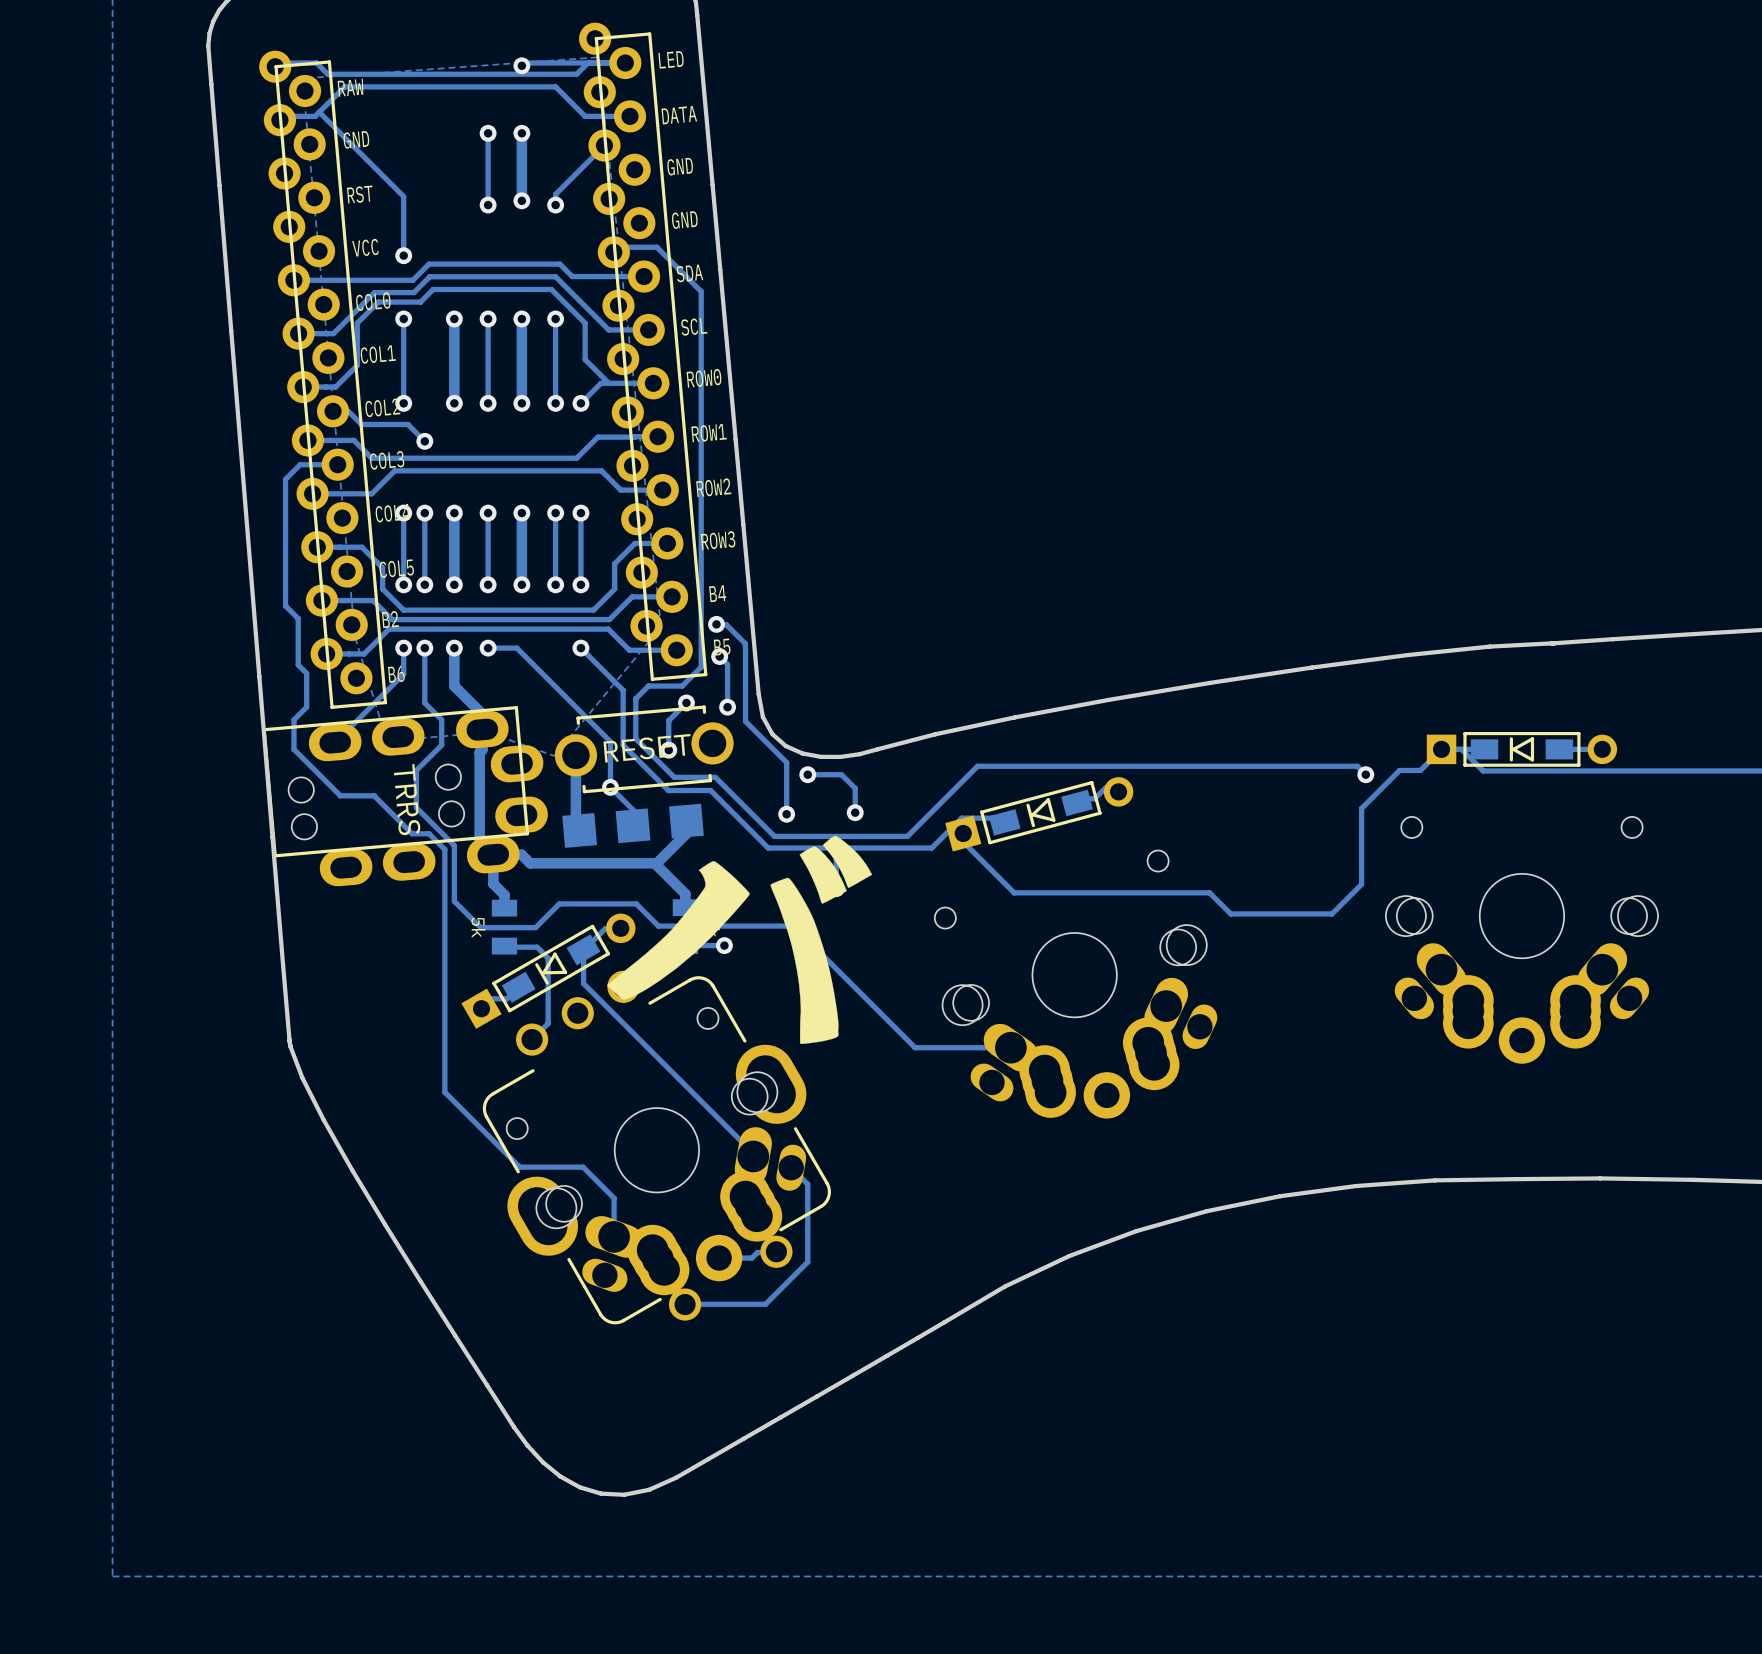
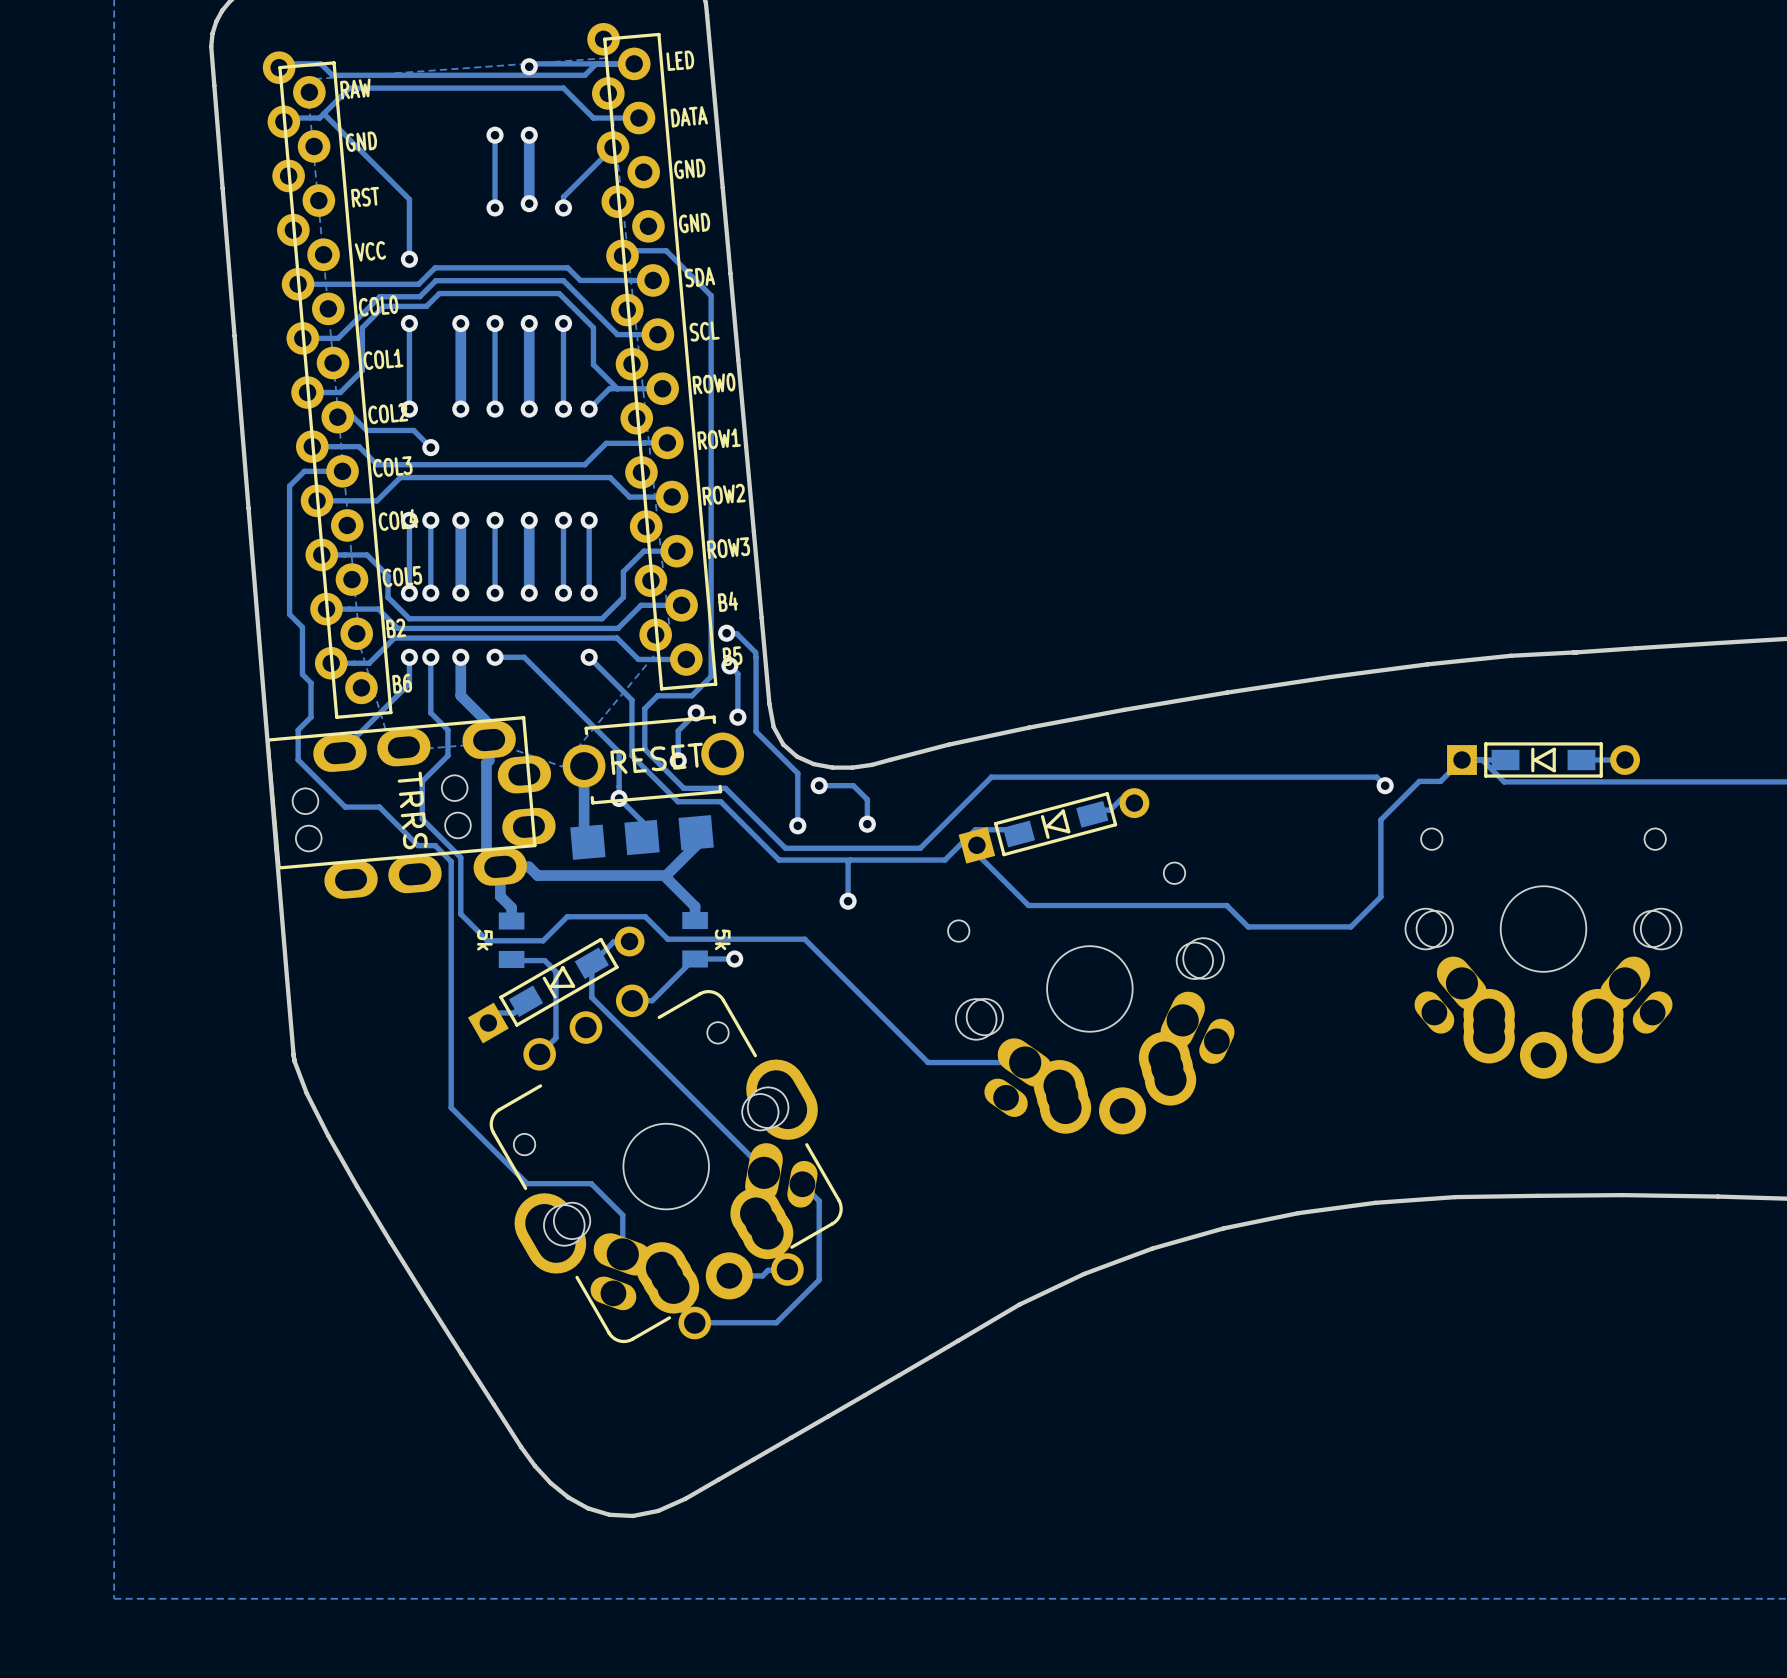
drawing: [607, 835, 873, 1044] -> none

